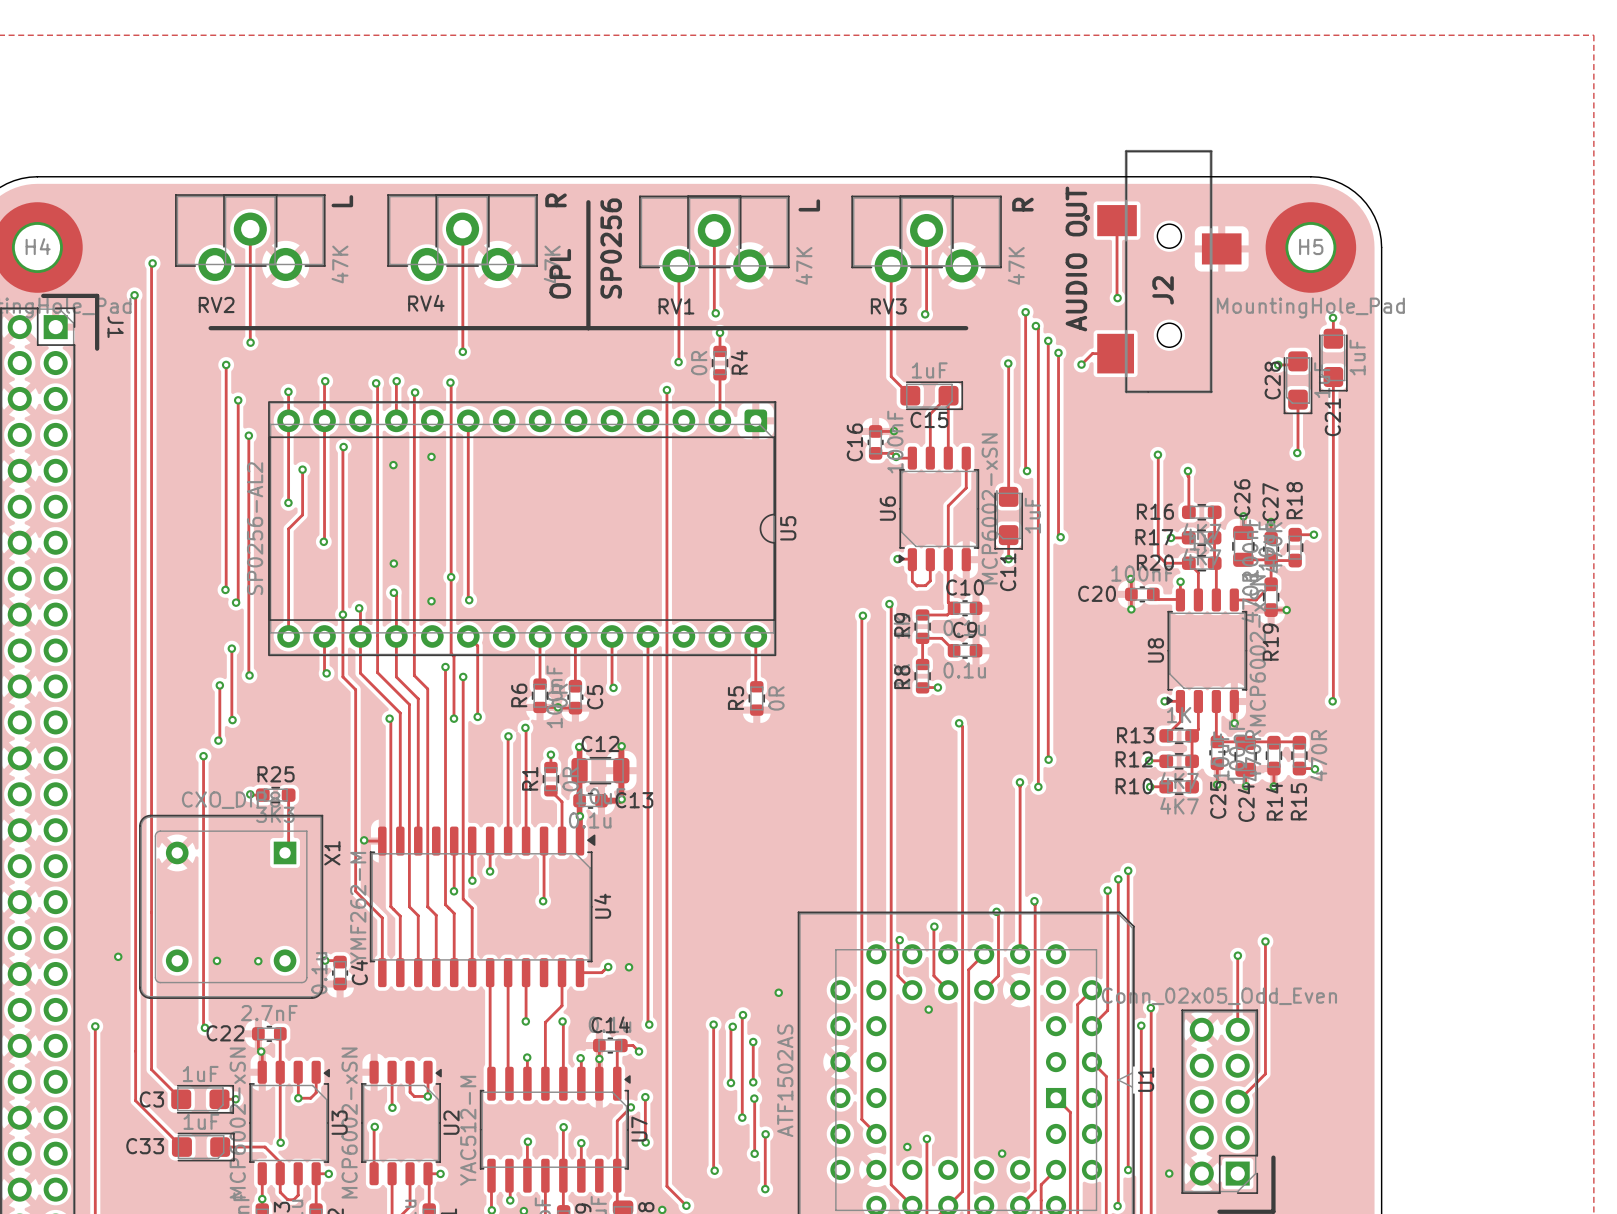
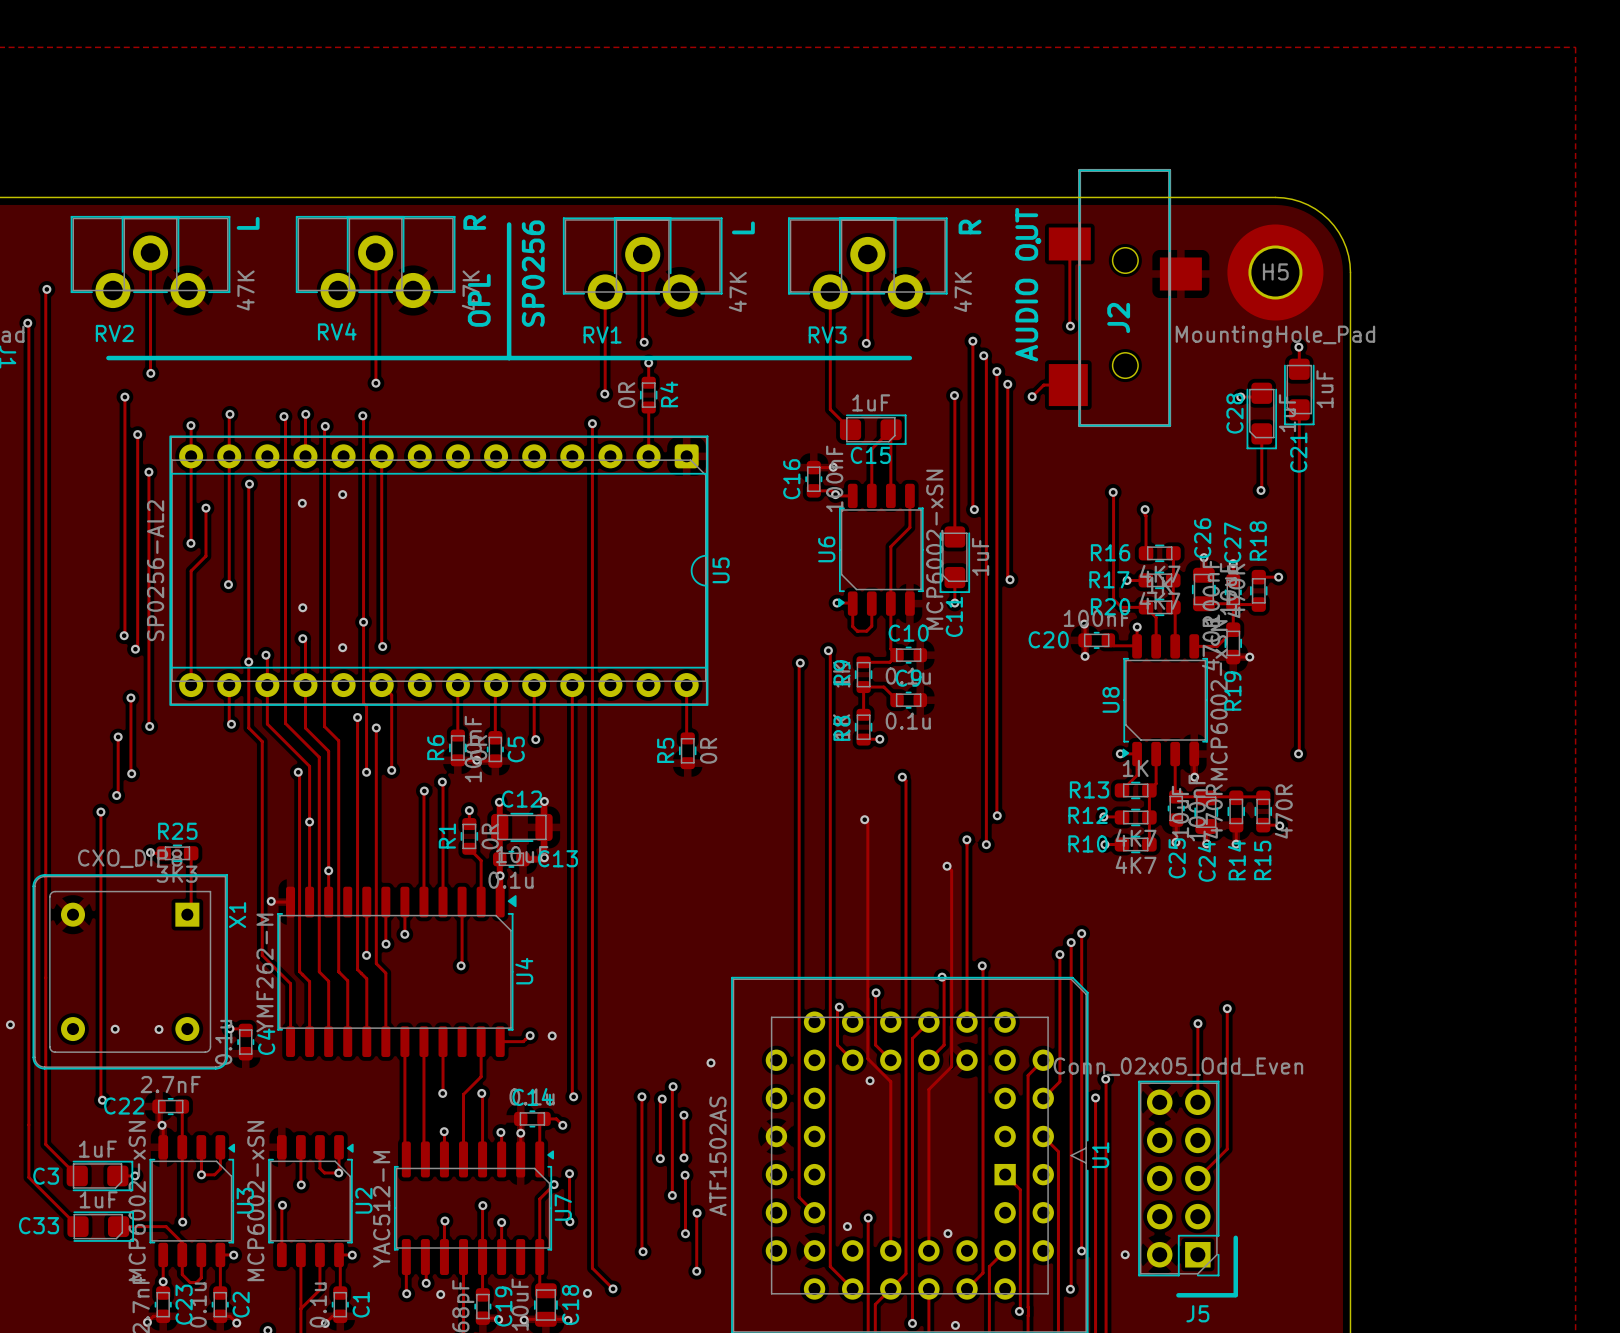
track: none -> (864, 819) (867, 822) (867, 1058) (890, 1081) (890, 1250)
via: none -> (864, 819)
via: none -> (309, 821)
track: none -> (947, 866) (951, 870) (951, 1066) (928, 1089) (928, 1250)
via: none -> (947, 866)
via: none -> (328, 870)

